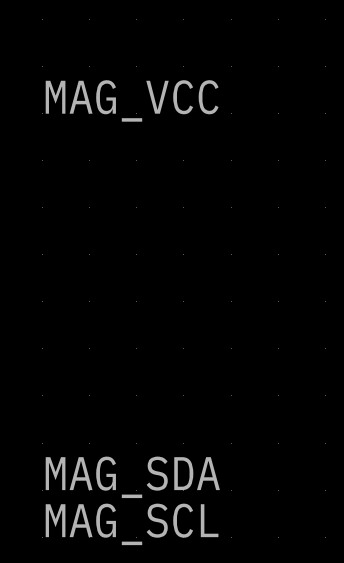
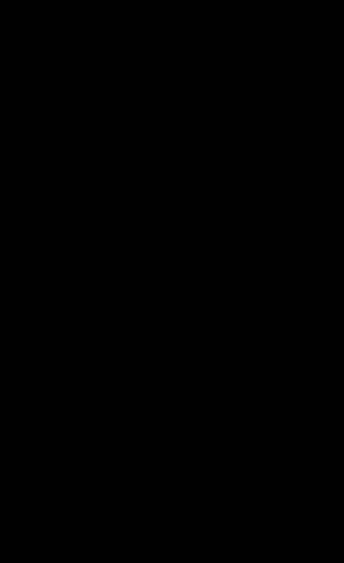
label: MAG_VCC (132, 100) -> none
label: MAG_SDA (132, 477) -> none
label: MAG_SCL (132, 524) -> none

